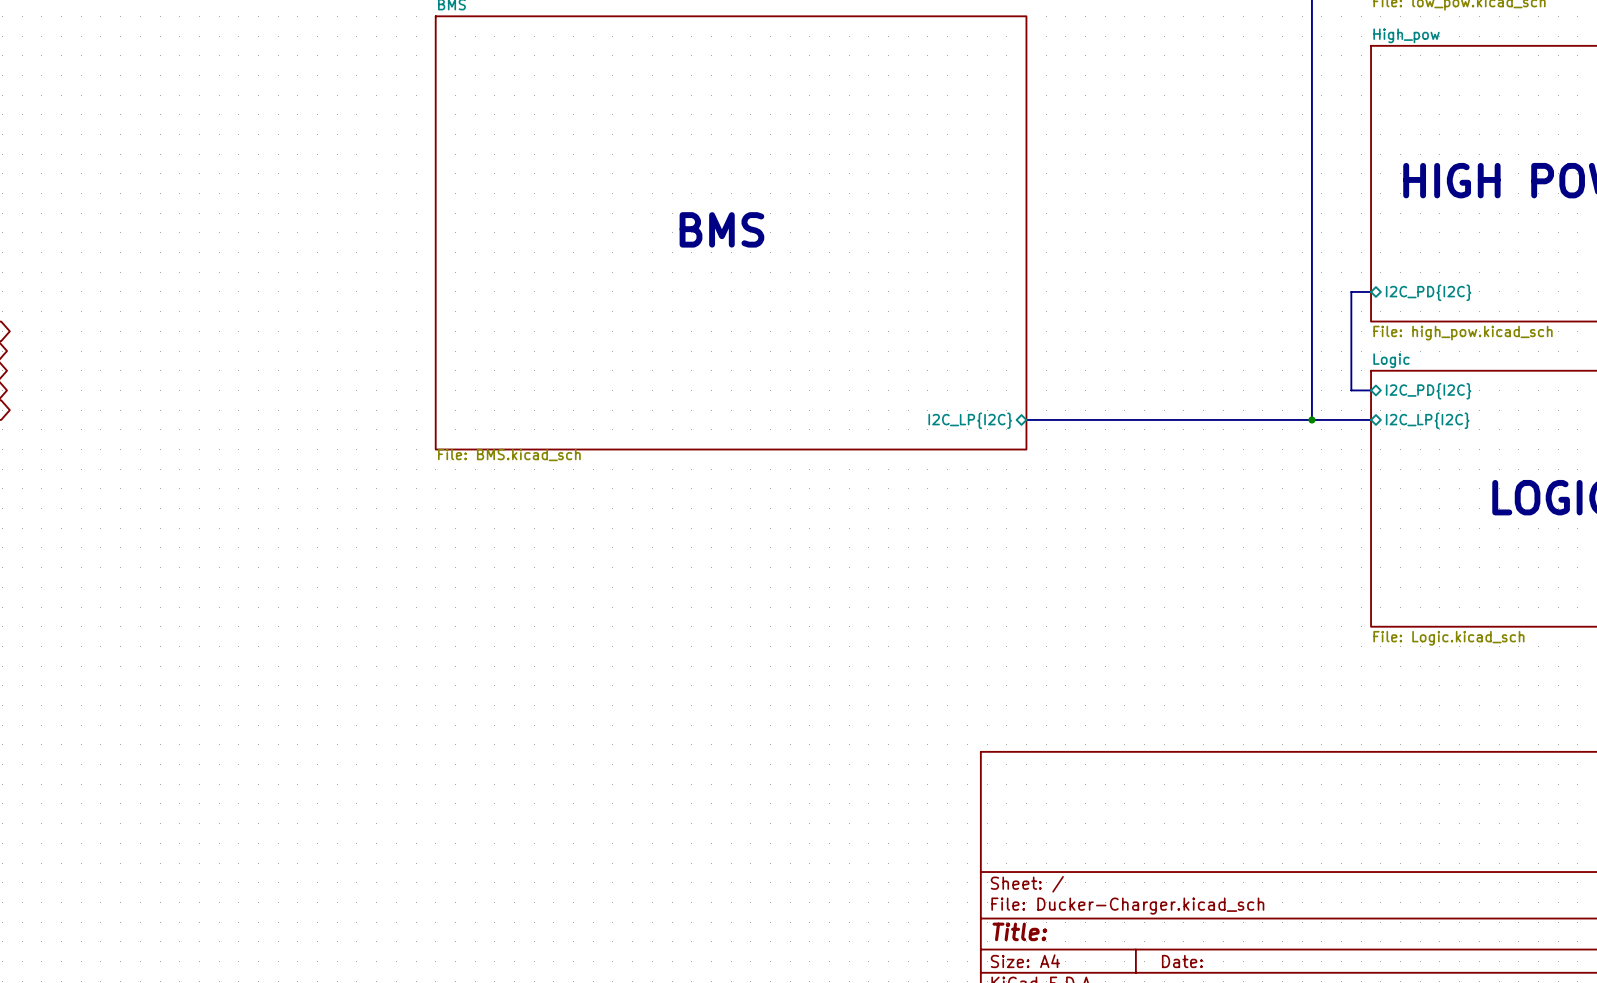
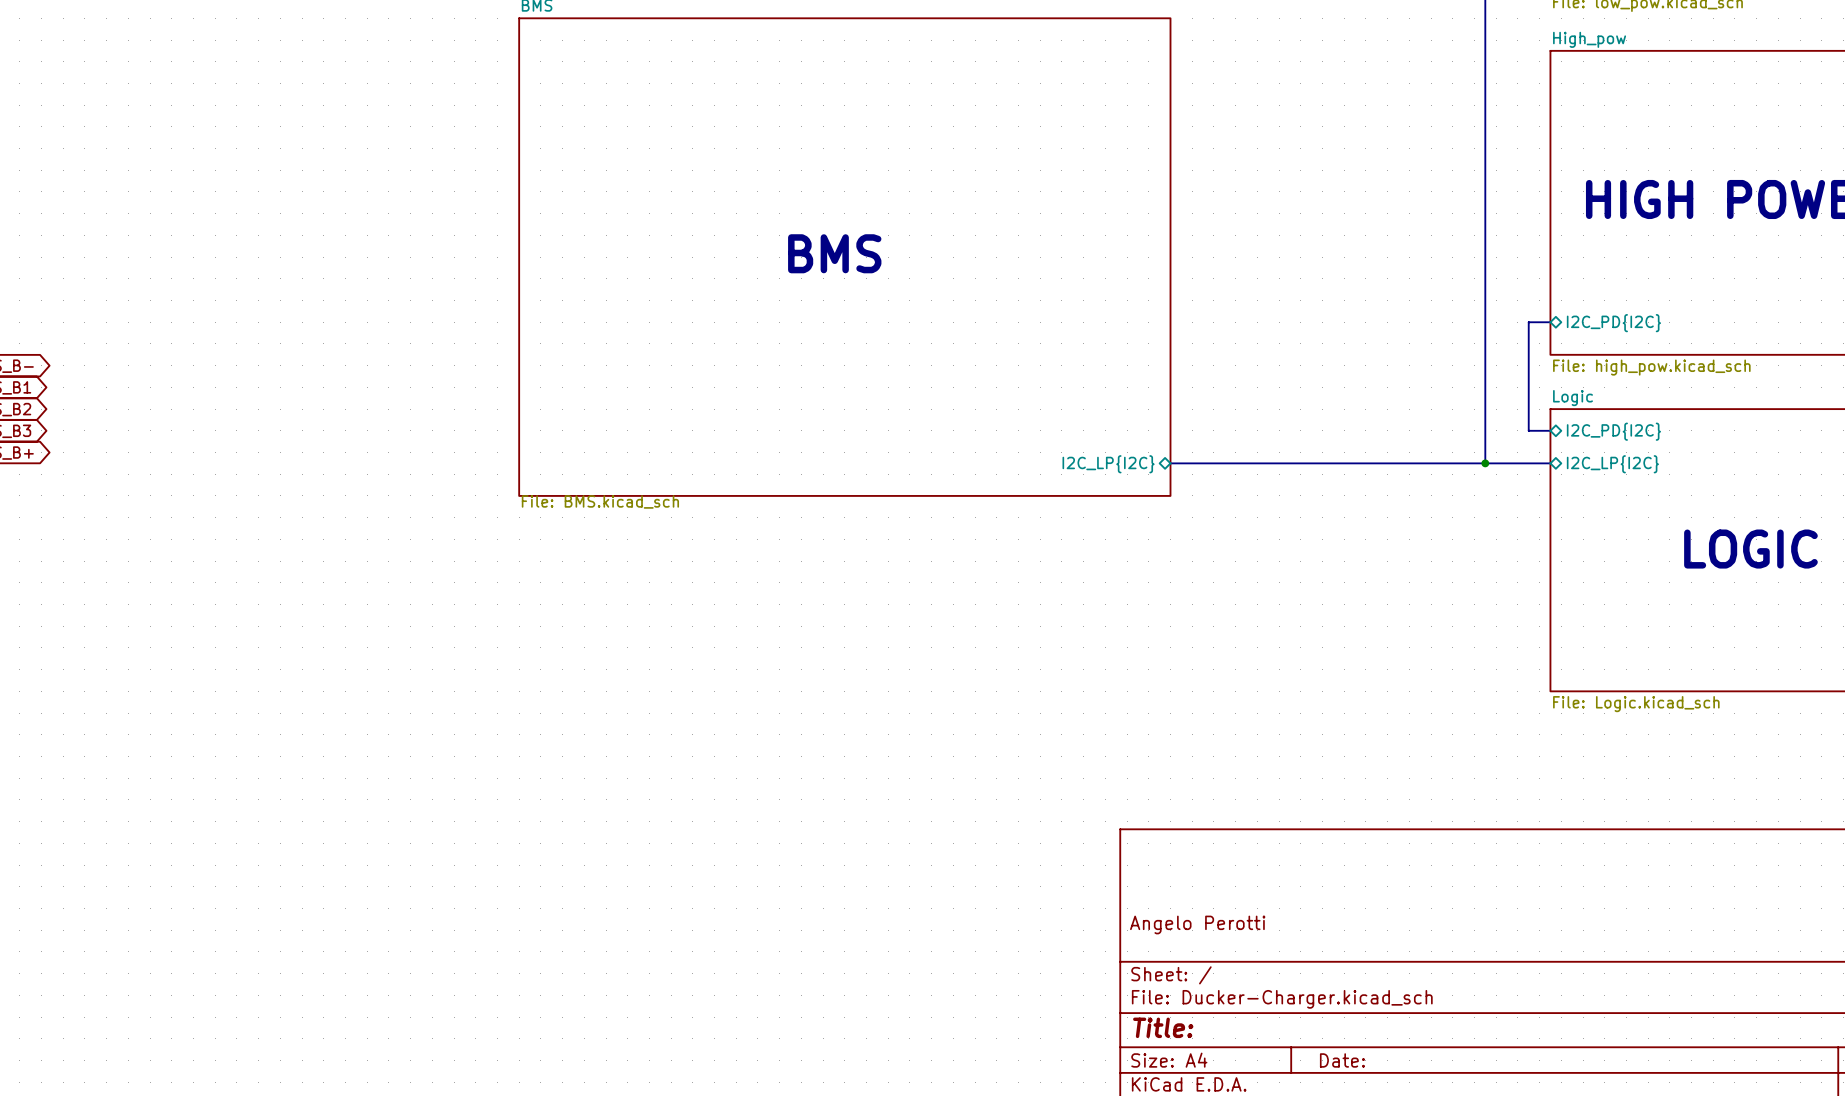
title block: none -> Angelo Perotti (1197, 924)

